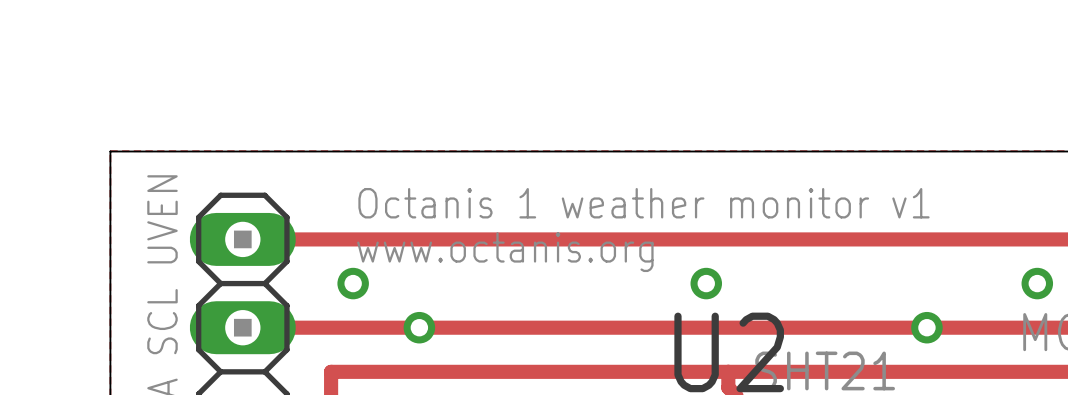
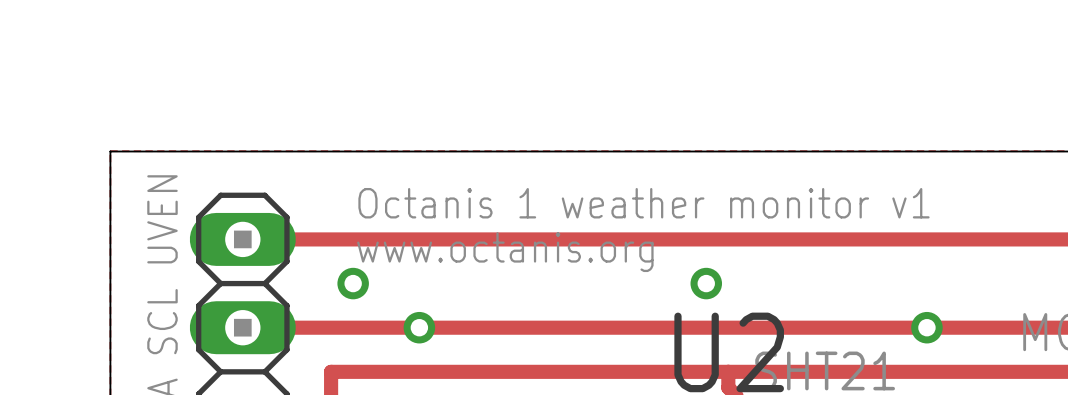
via: (1037, 283) -> none

